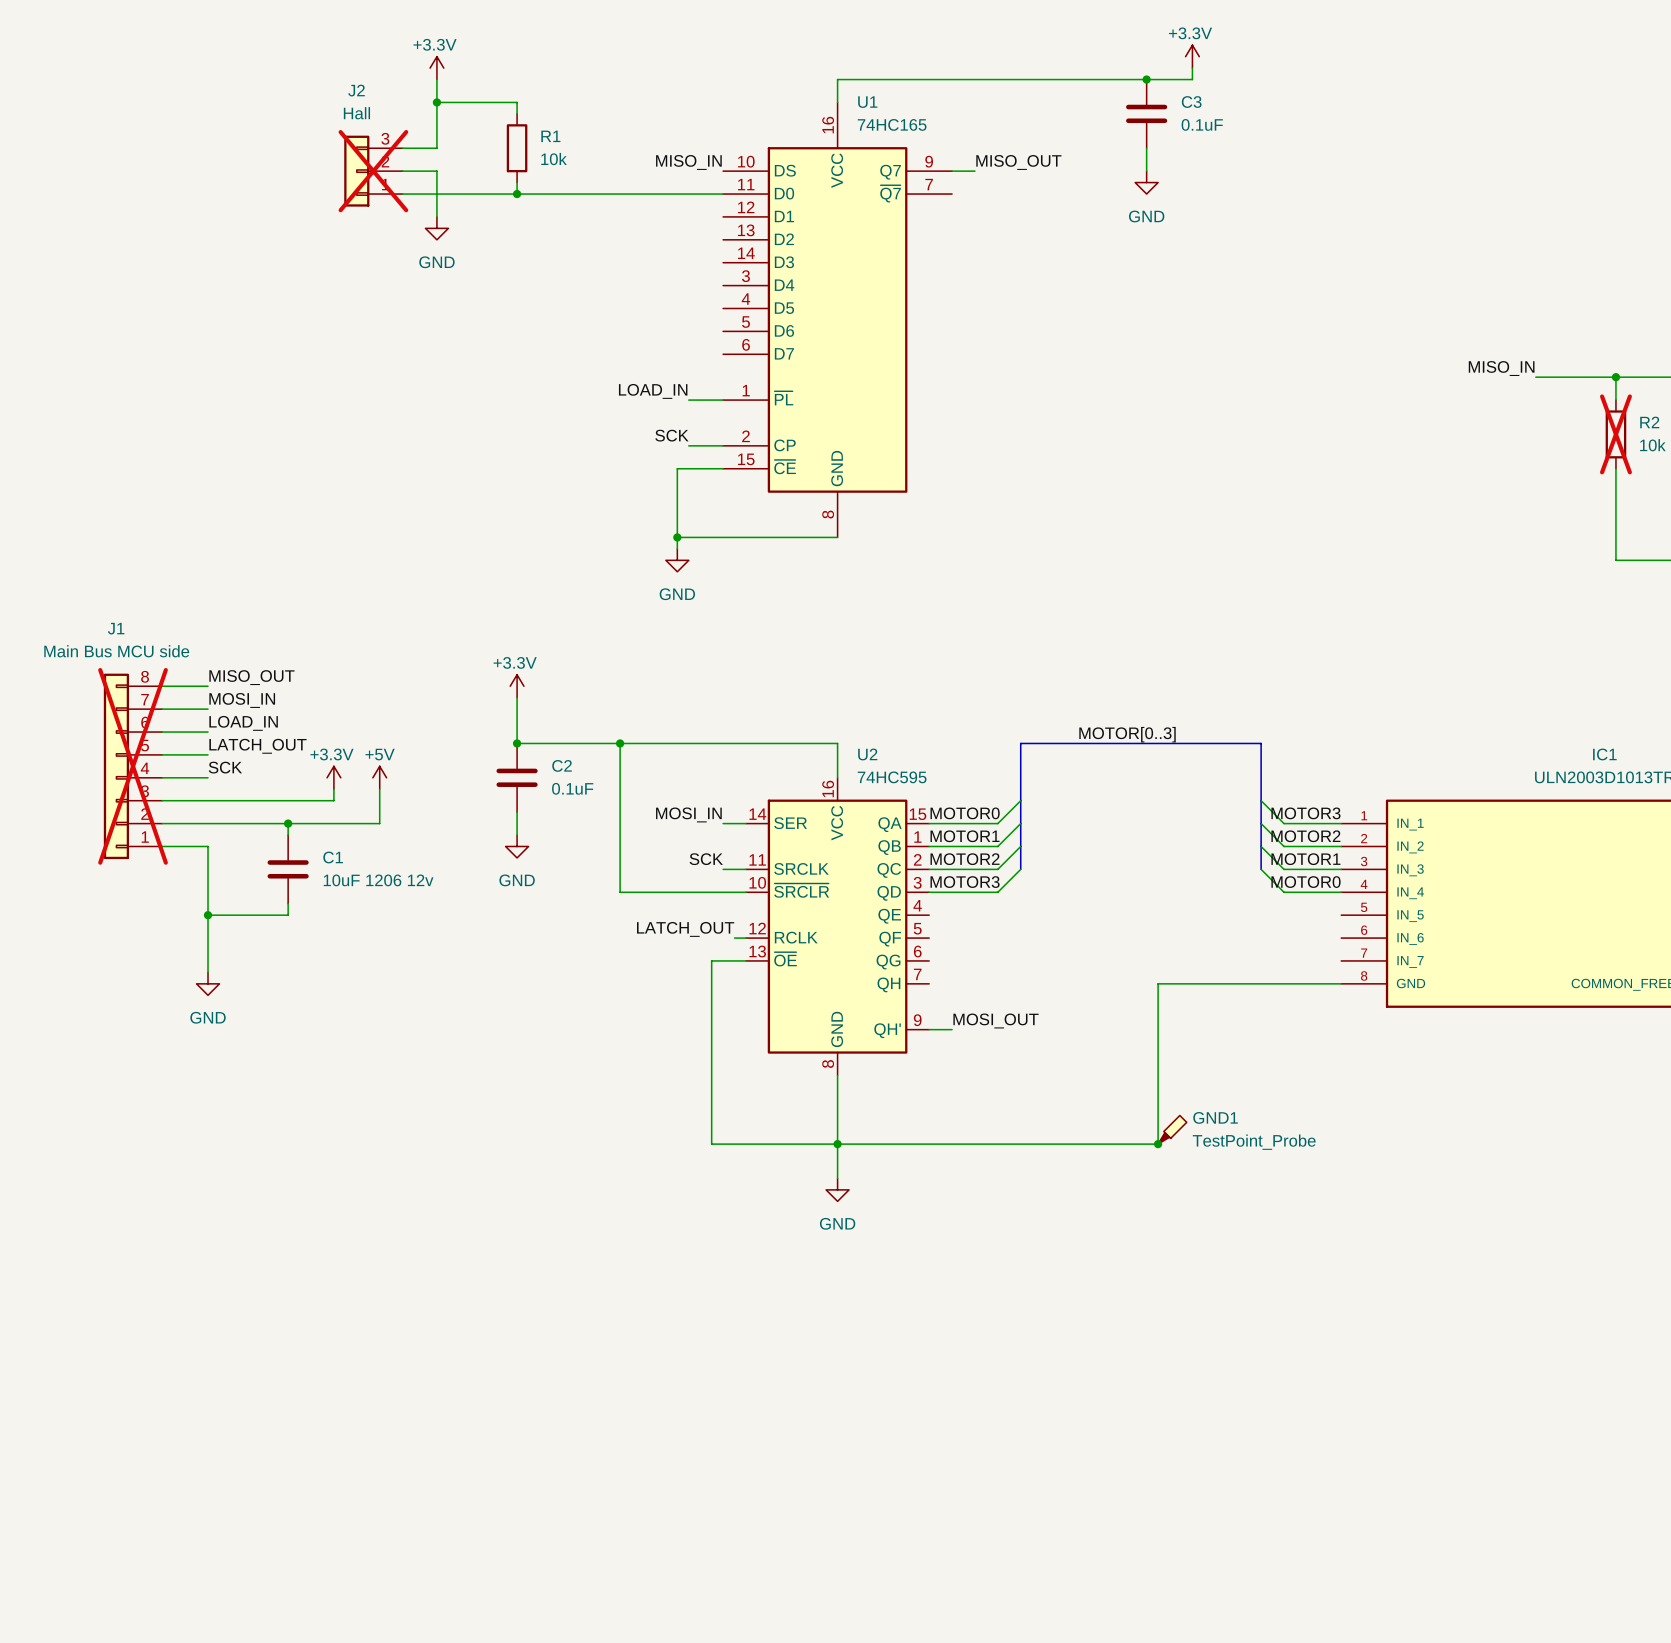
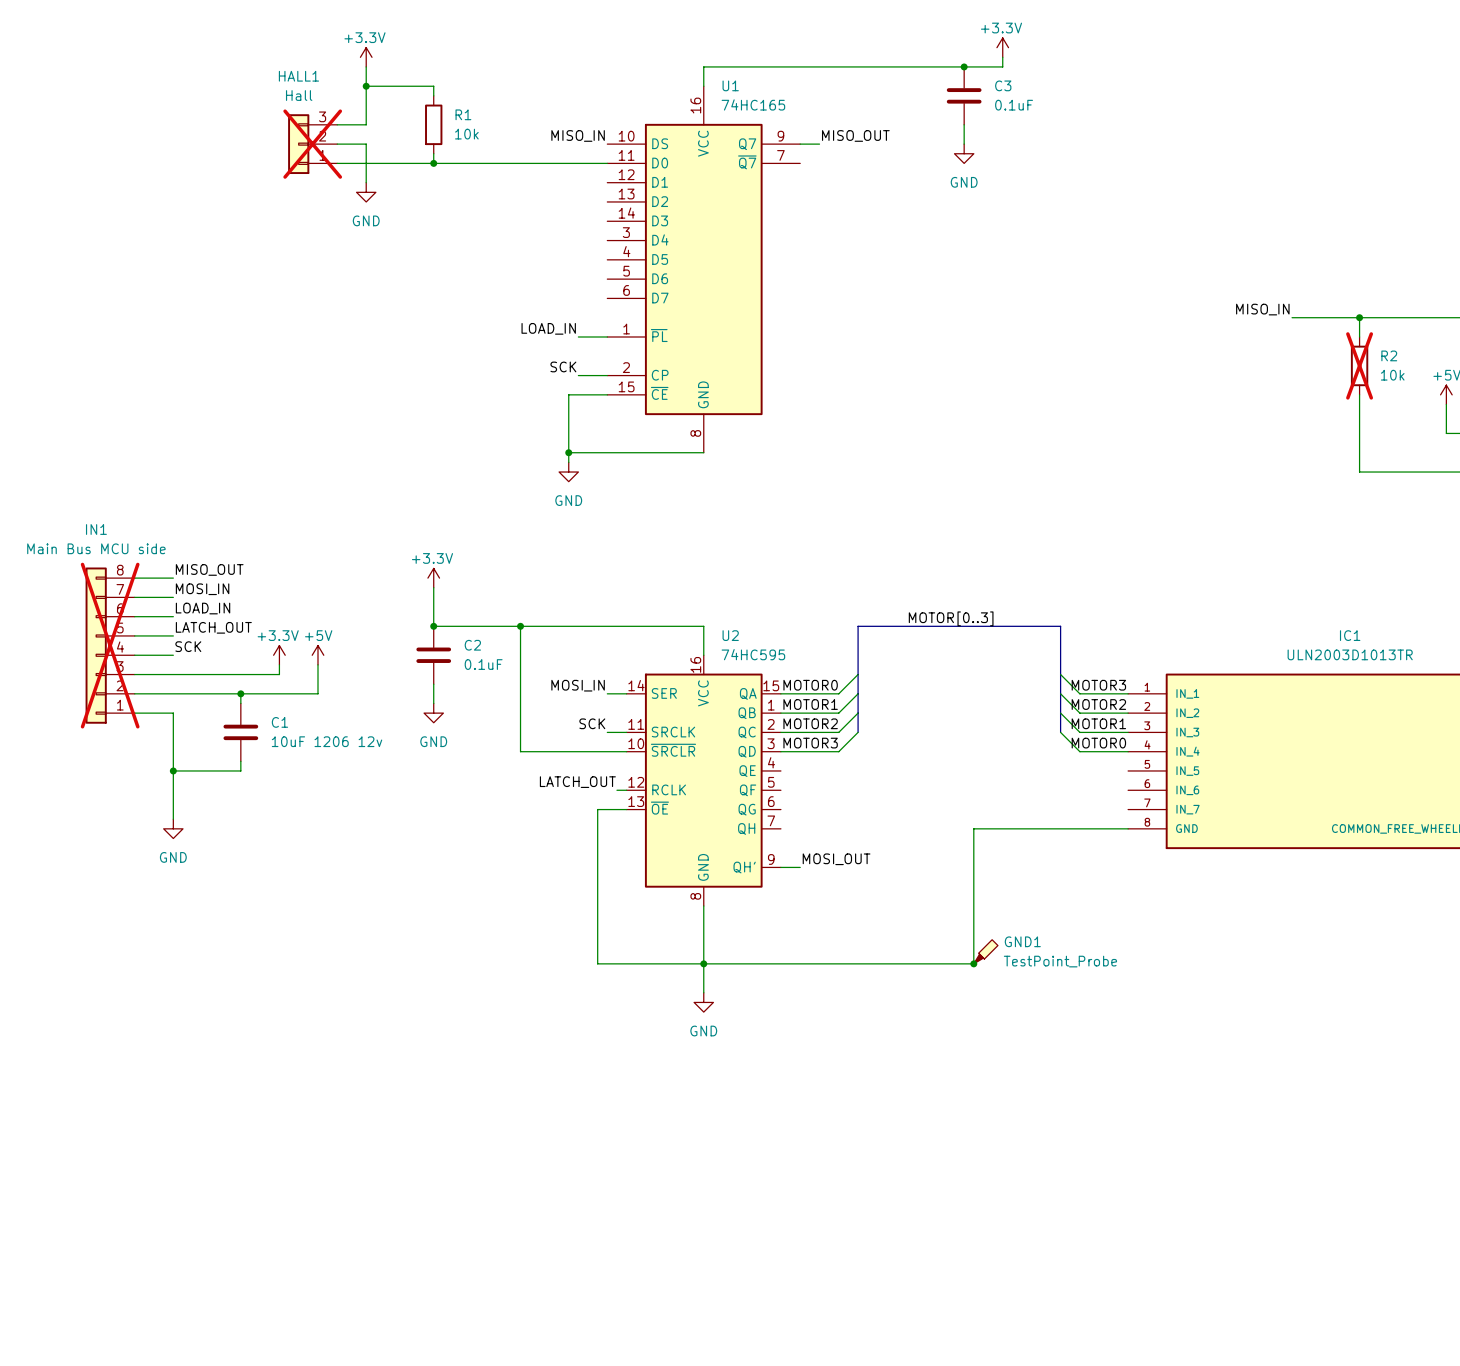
J2 name: J2 (356, 90) -> HALL1 (298, 76)
J1 name: J1 (116, 628) -> IN1 (96, 529)

